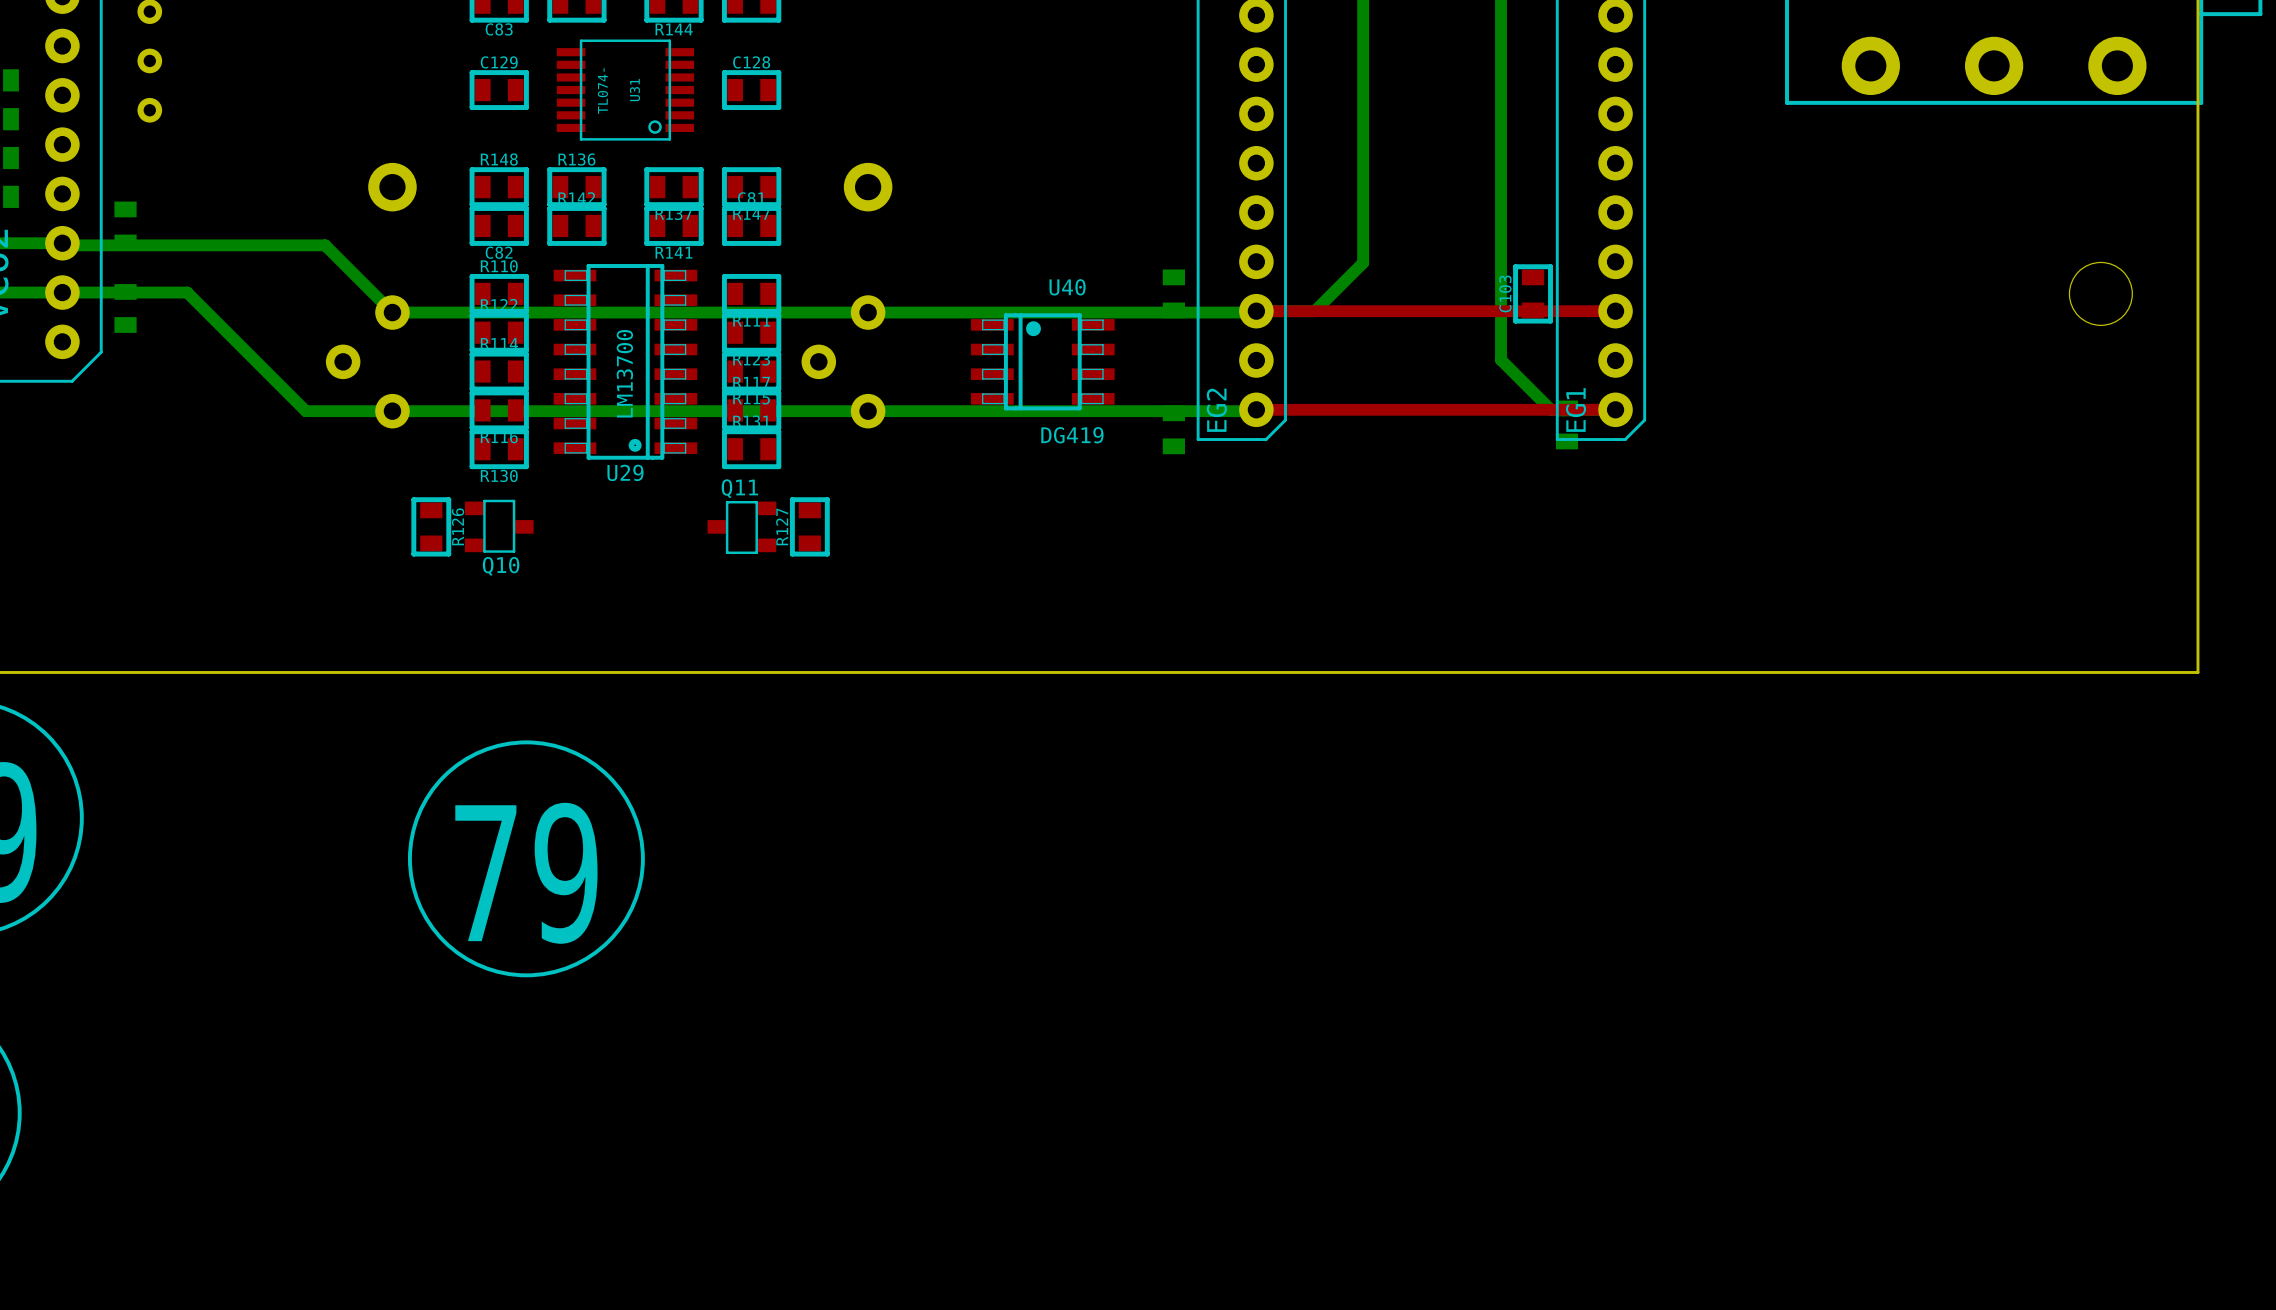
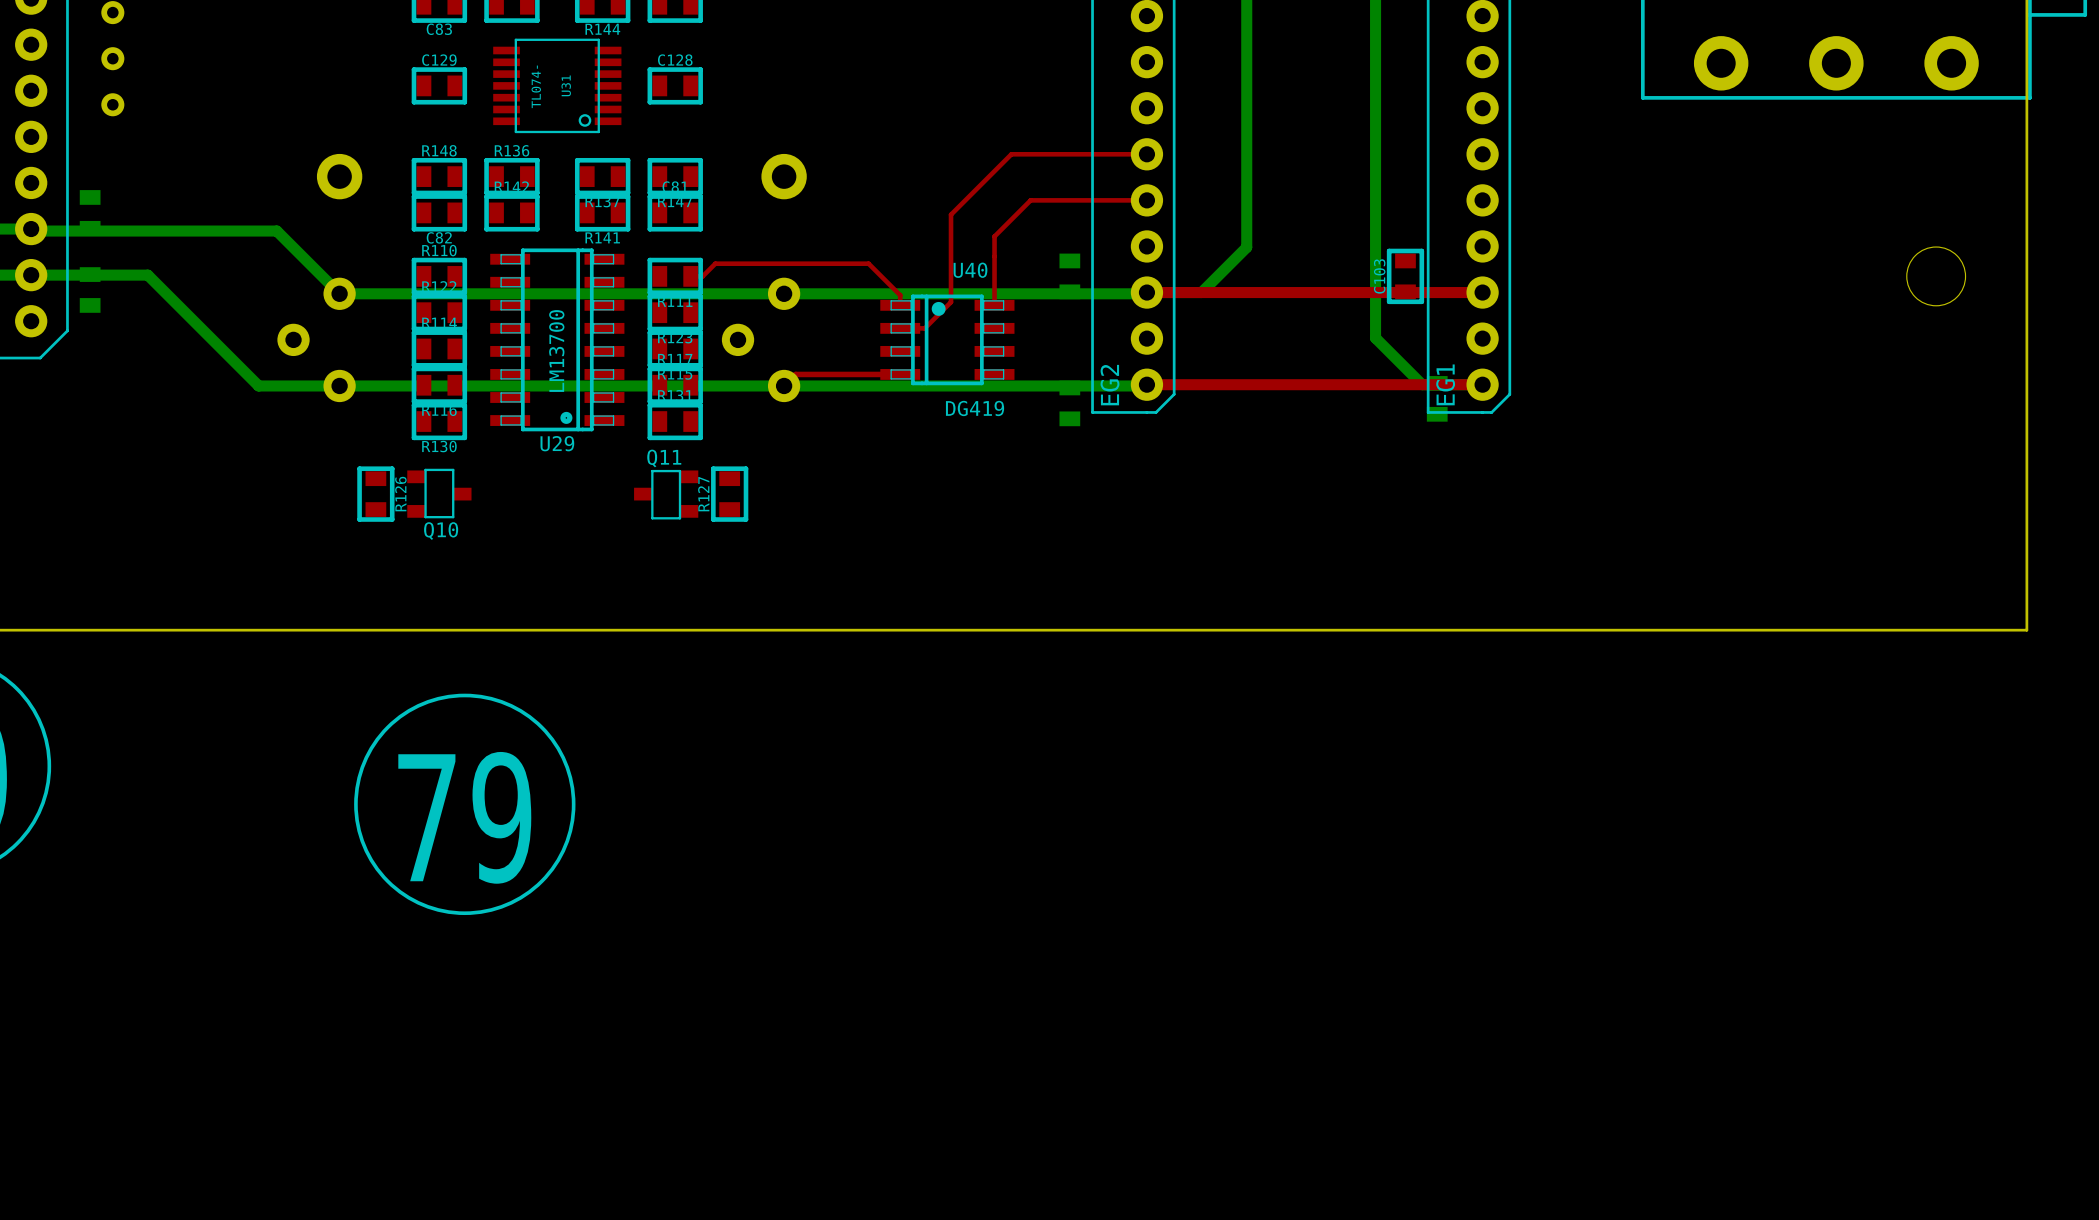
top track: none -> (1146, 154) (1011, 154) (951, 214) (951, 302) (924, 328) (900, 328)
top track: none -> (1146, 200) (1030, 200) (994, 236) (994, 305)
top track: none -> (690, 276) (702, 276) (715, 263) (868, 263) (900, 295) (900, 305)
top track: none -> (900, 374) (795, 374) (784, 385)

